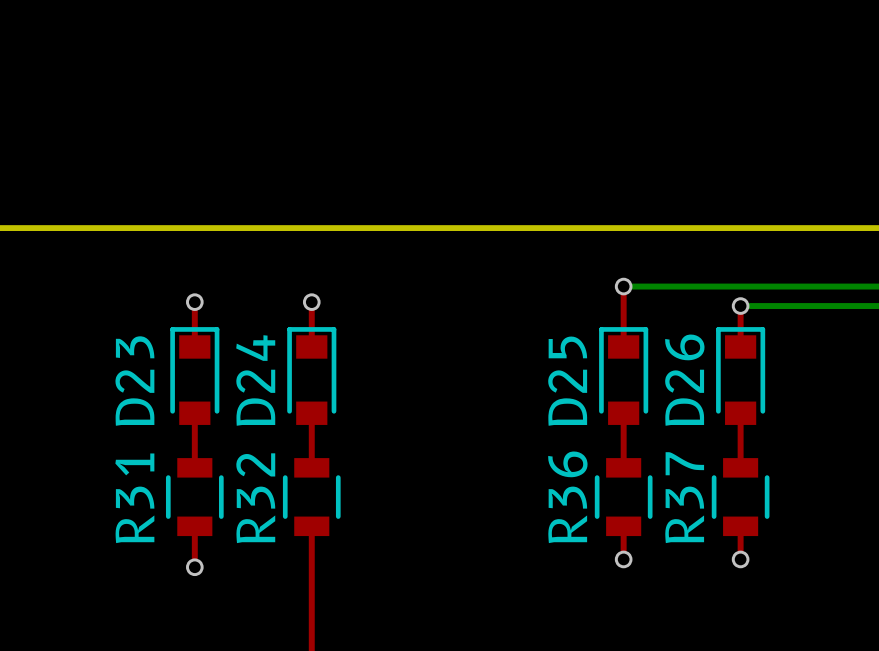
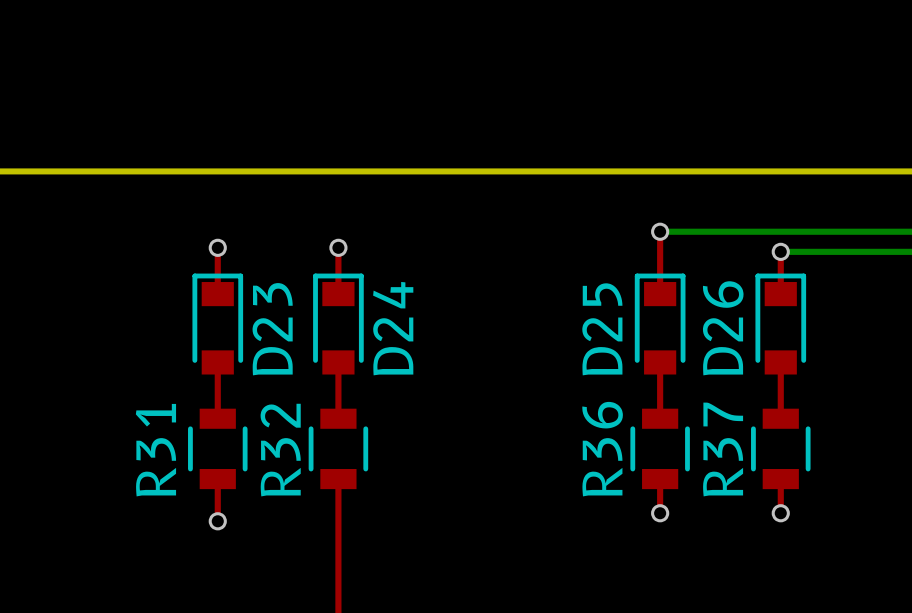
D24 name position: D24 (255, 380) -> D24 (393, 328)
D23 name position: D23 (134, 381) -> D23 (272, 329)

